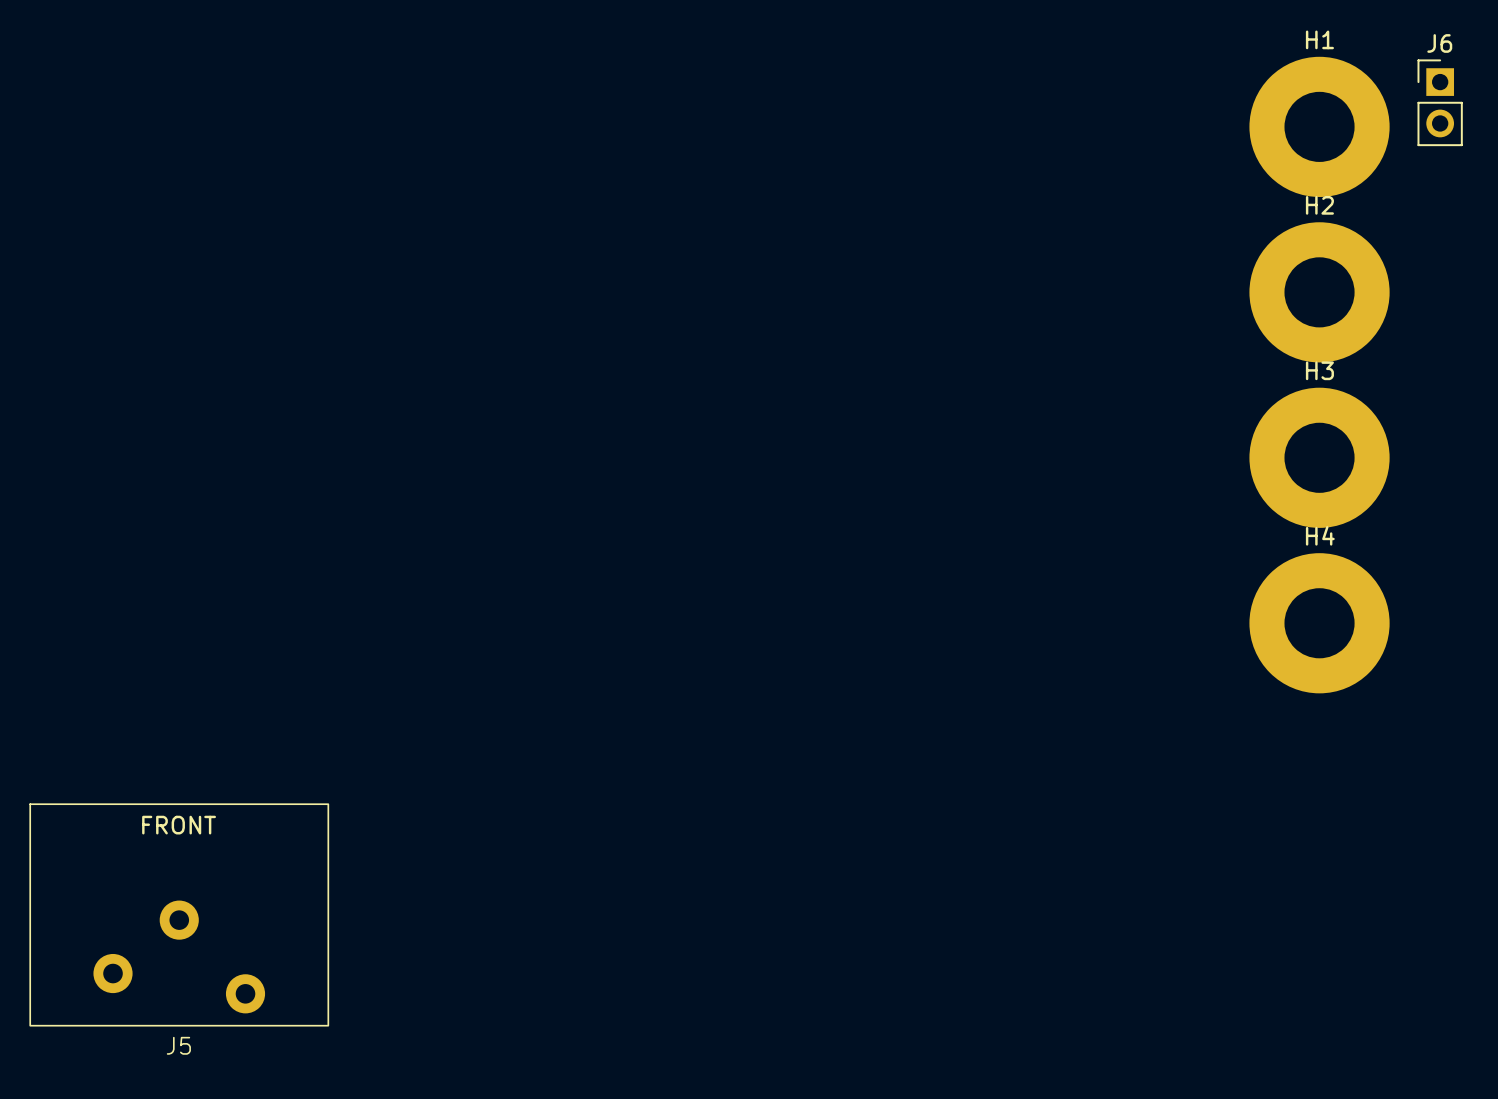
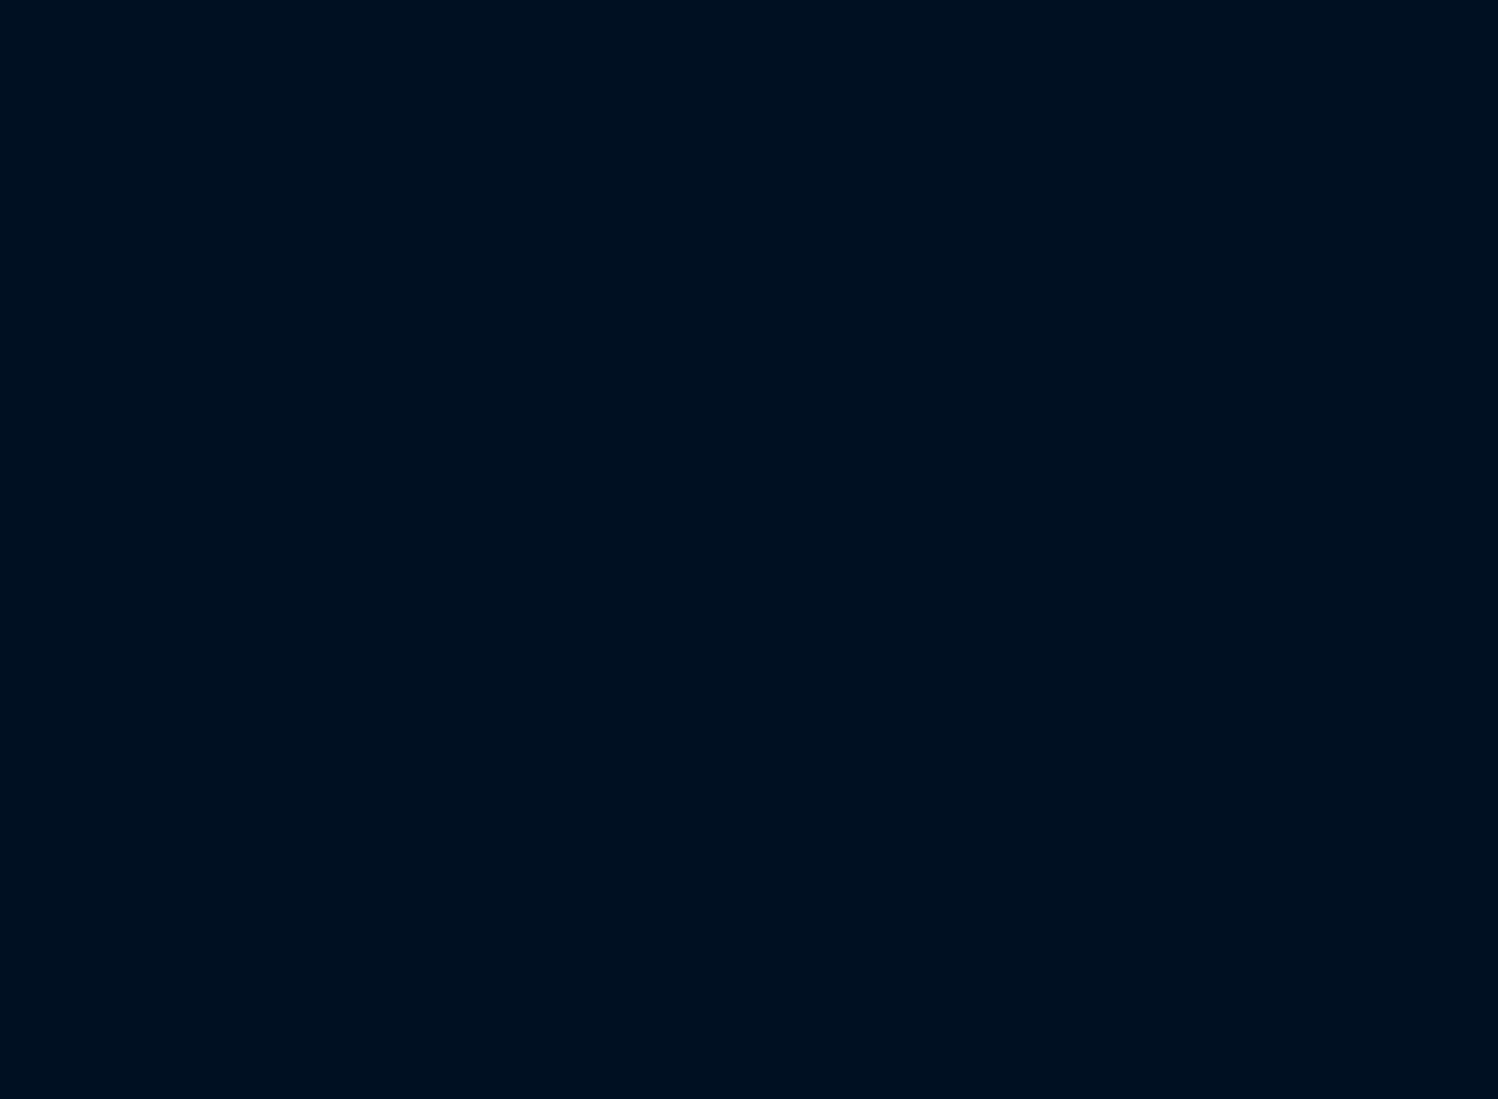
J6: (1440, 102) -> none
H1: (1319, 126) -> none
H2: (1319, 292) -> none
H3: (1319, 457) -> none
H4: (1319, 623) -> none
J5: (179, 914) -> none

